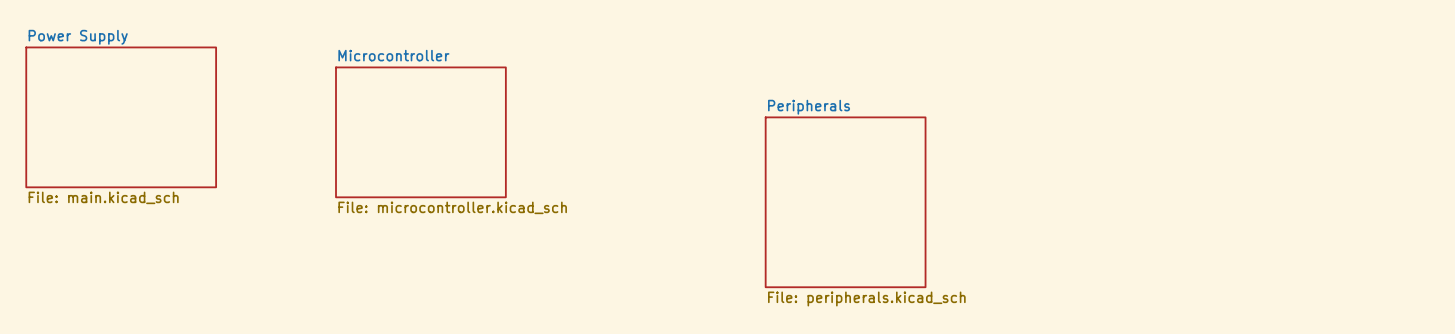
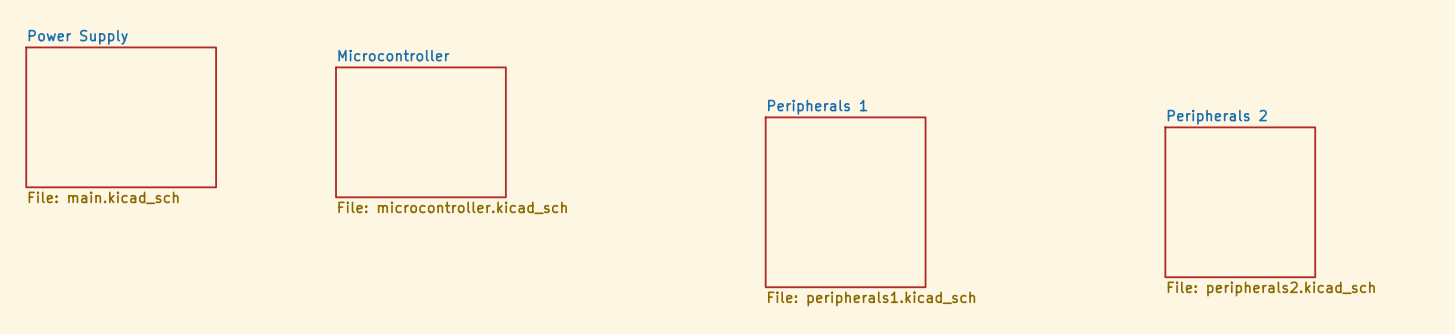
sheet Peripherals name: Peripherals (809, 107) -> Peripherals 1 (817, 107)
sheet Peripherals 2: none -> File: peripherals2.kicad_sch (1240, 202)
sheet Peripherals value: File: peripherals.kicad_sch (866, 298) -> File: peripherals1.kicad_sch (871, 298)

